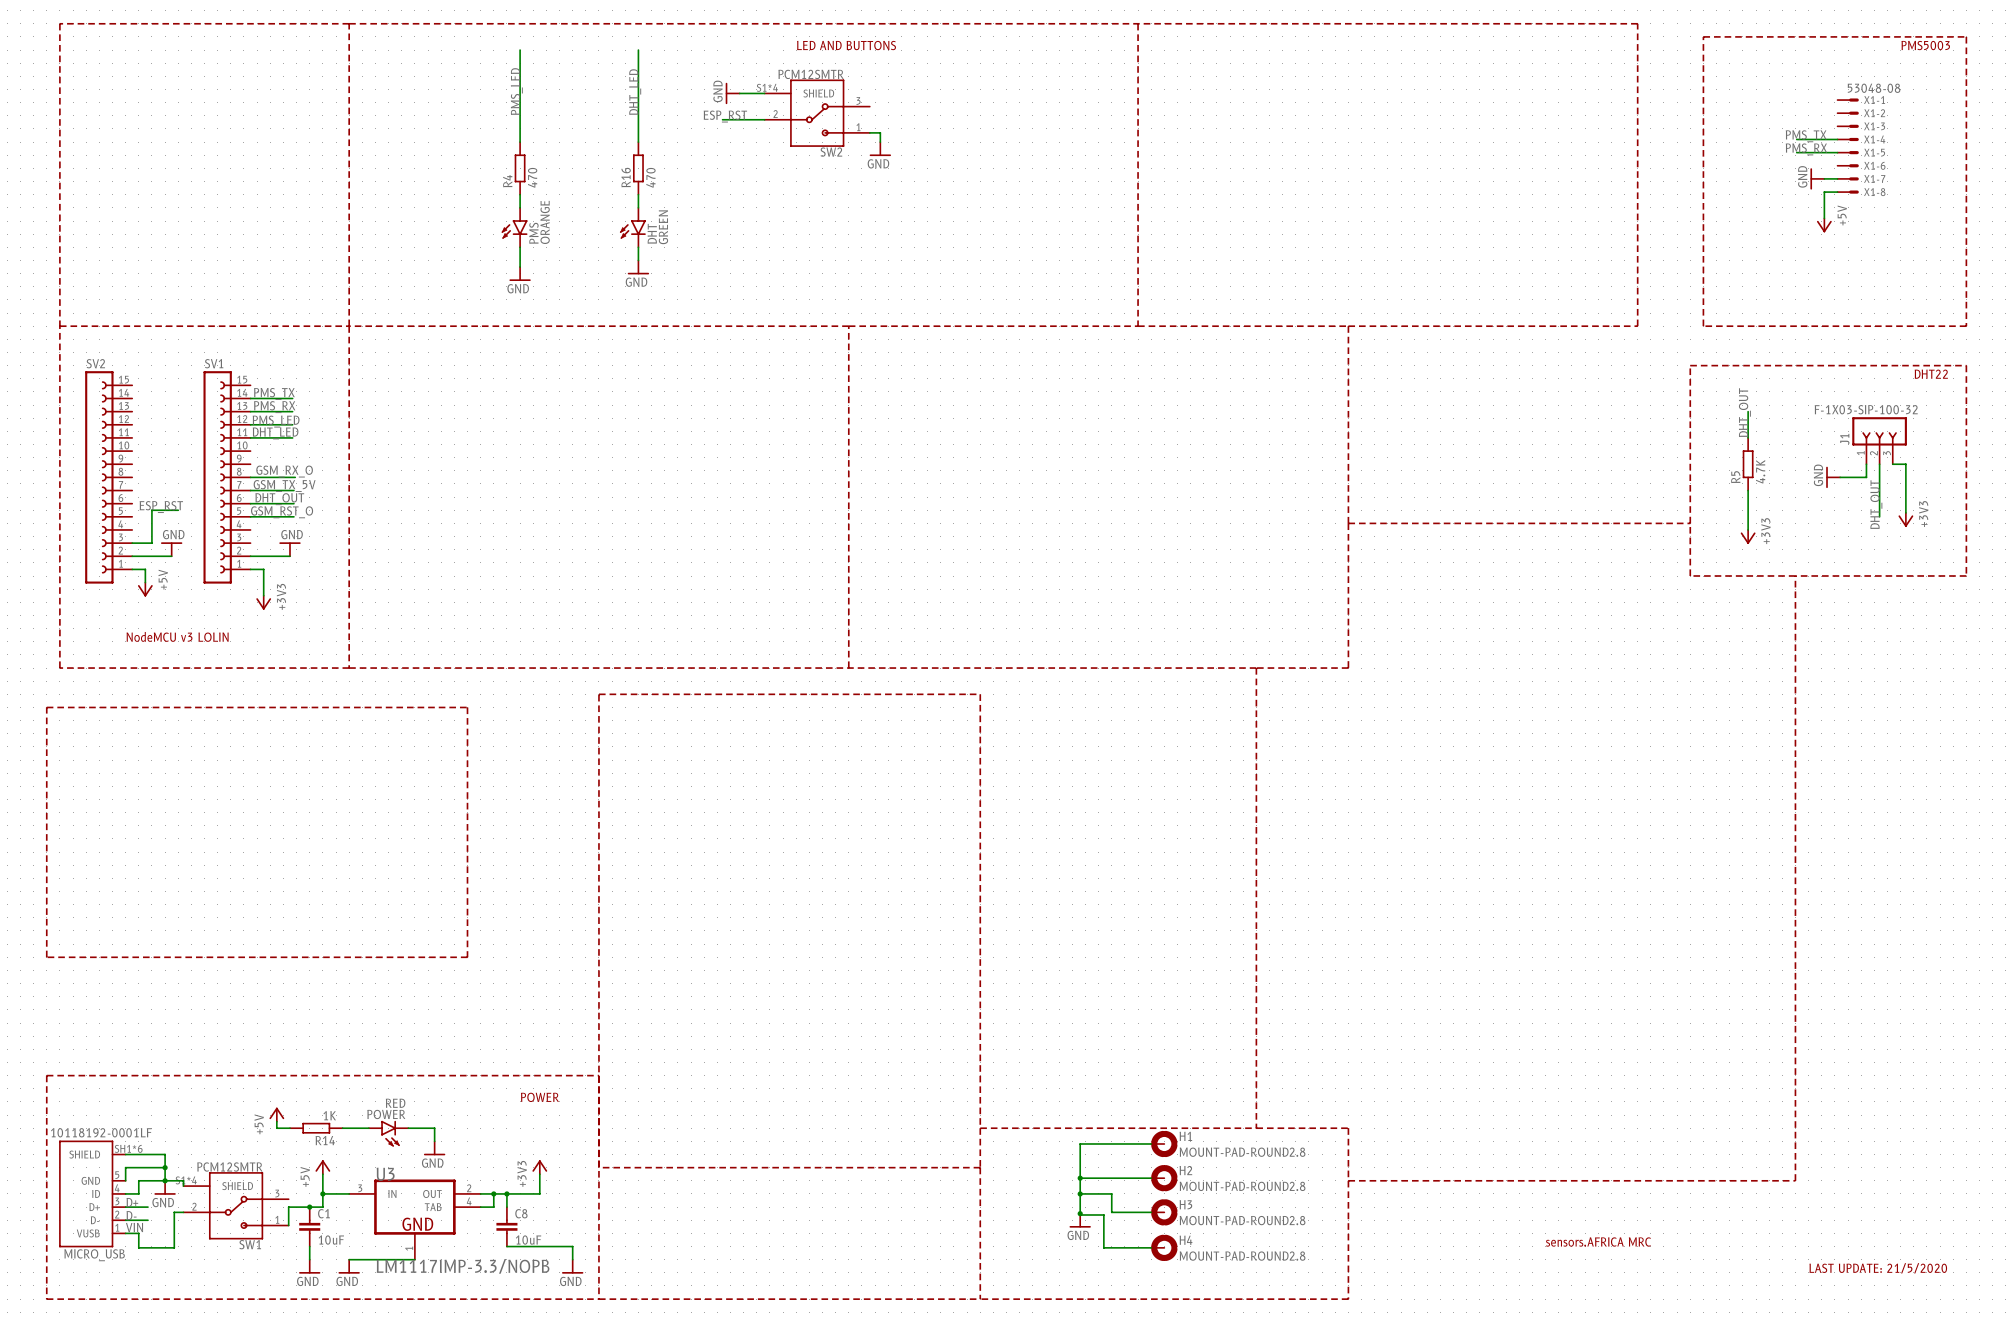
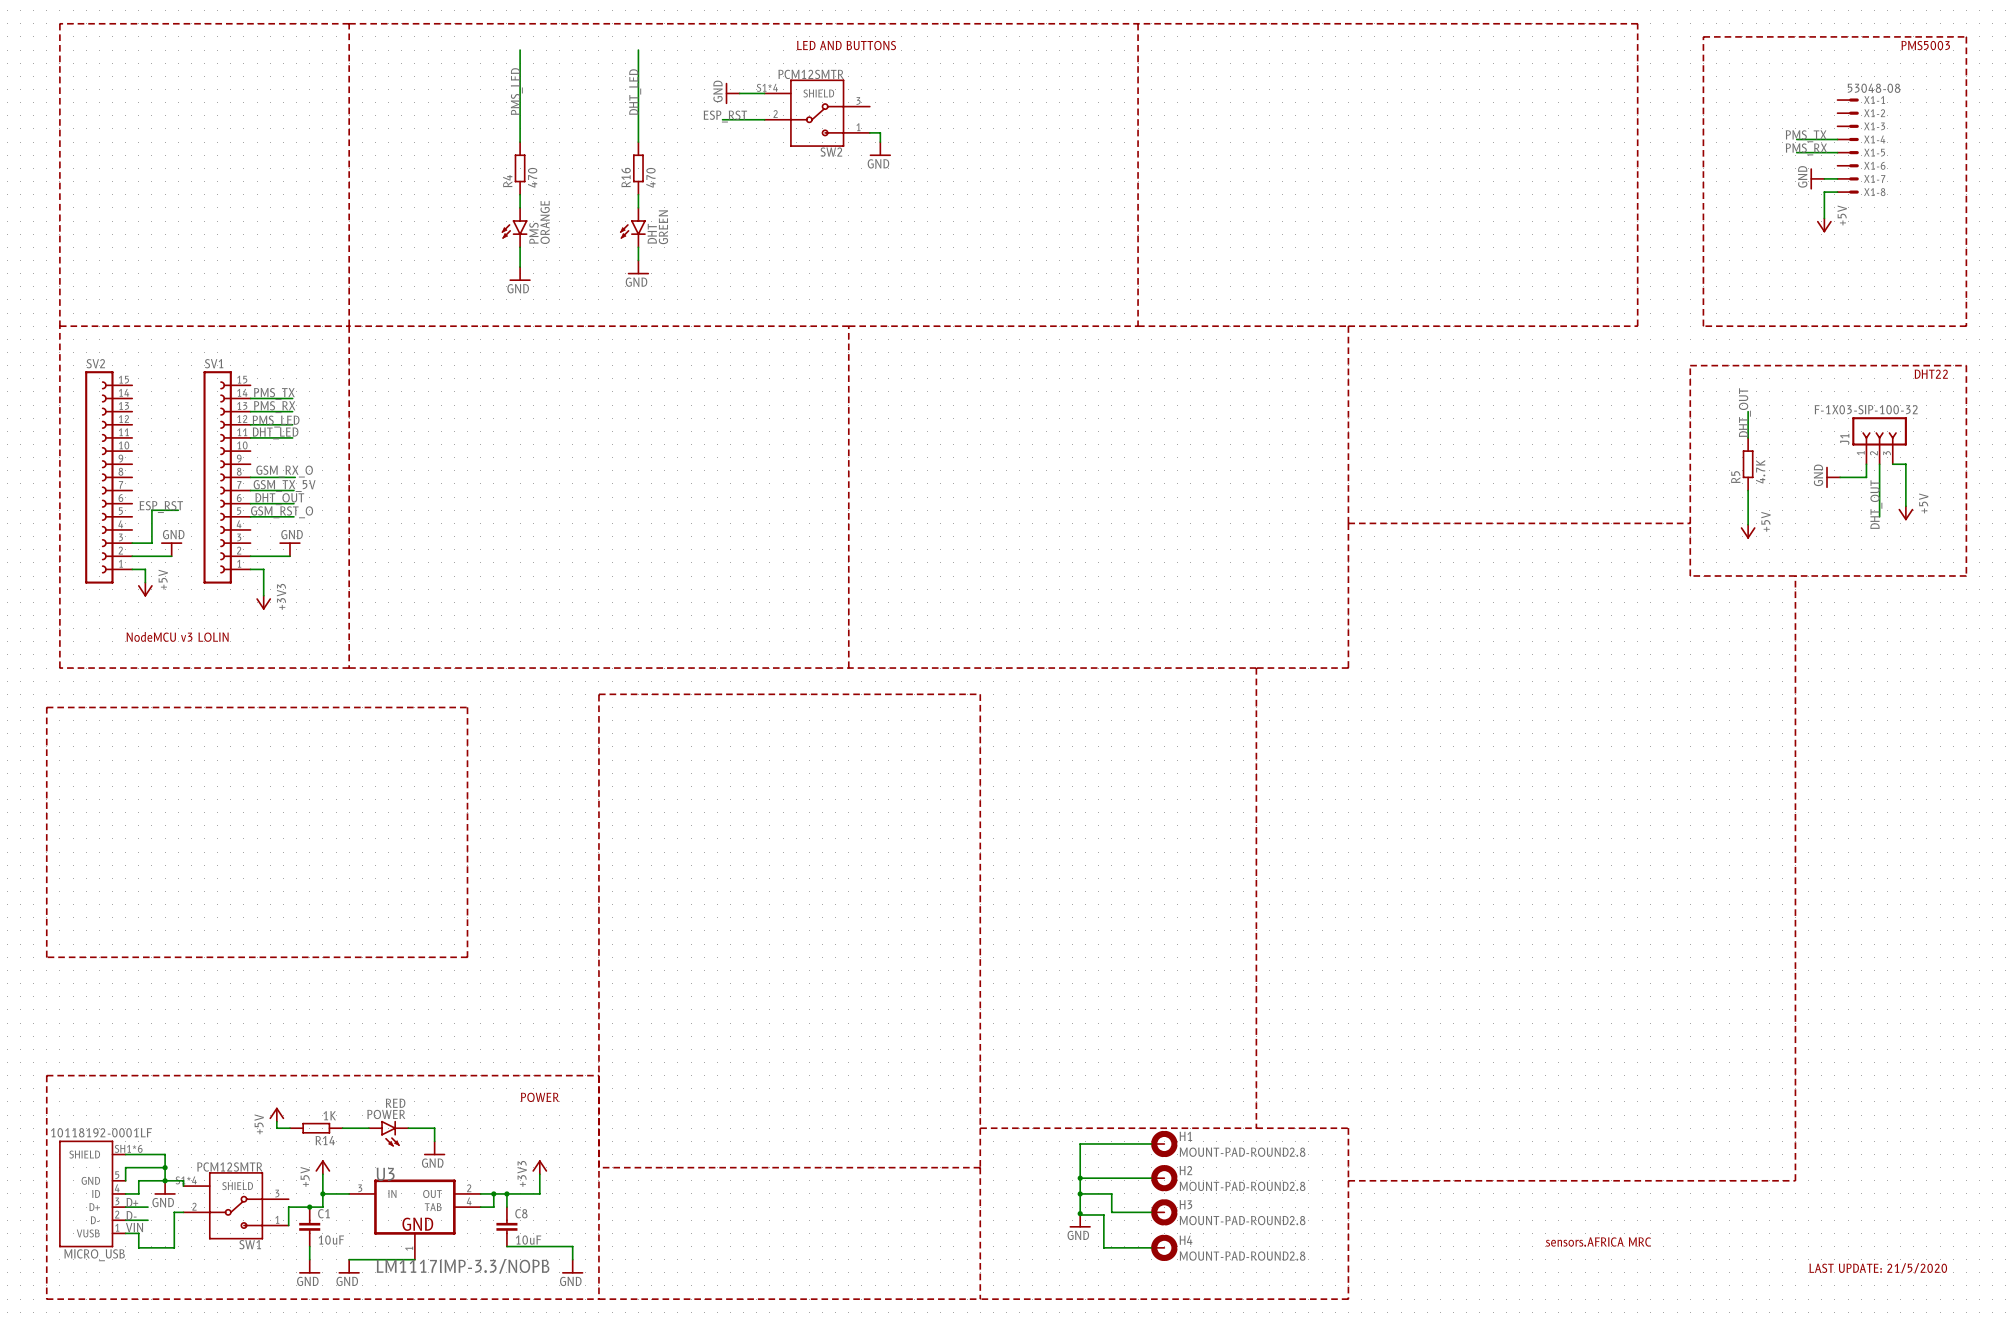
power symbol: none -> +5V (1905, 513)
power symbol: +3V3 (1905, 519) -> none
power symbol: none -> +5V (1748, 531)
power symbol: +3V3 (1748, 536) -> none

